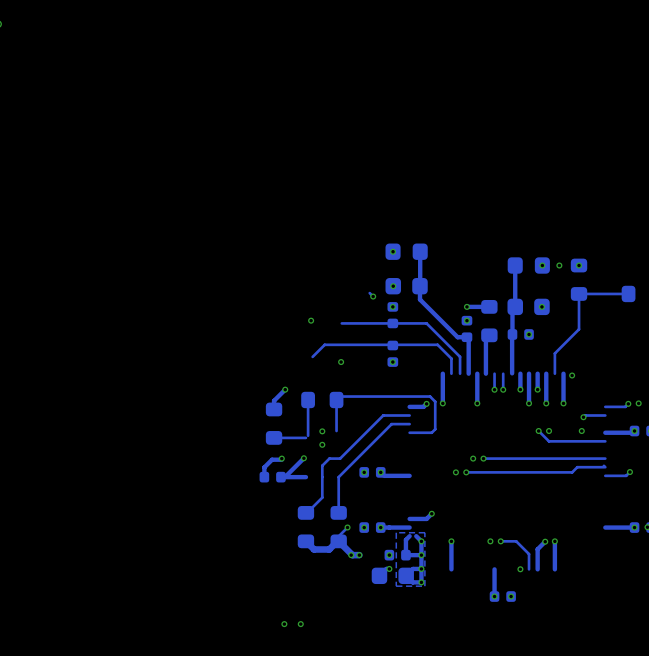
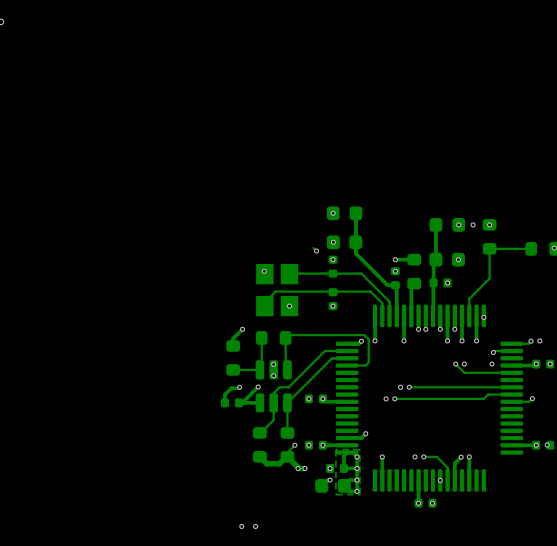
part: none -> (277, 290)
part: none -> (273, 386)
part: none -> (429, 398)

